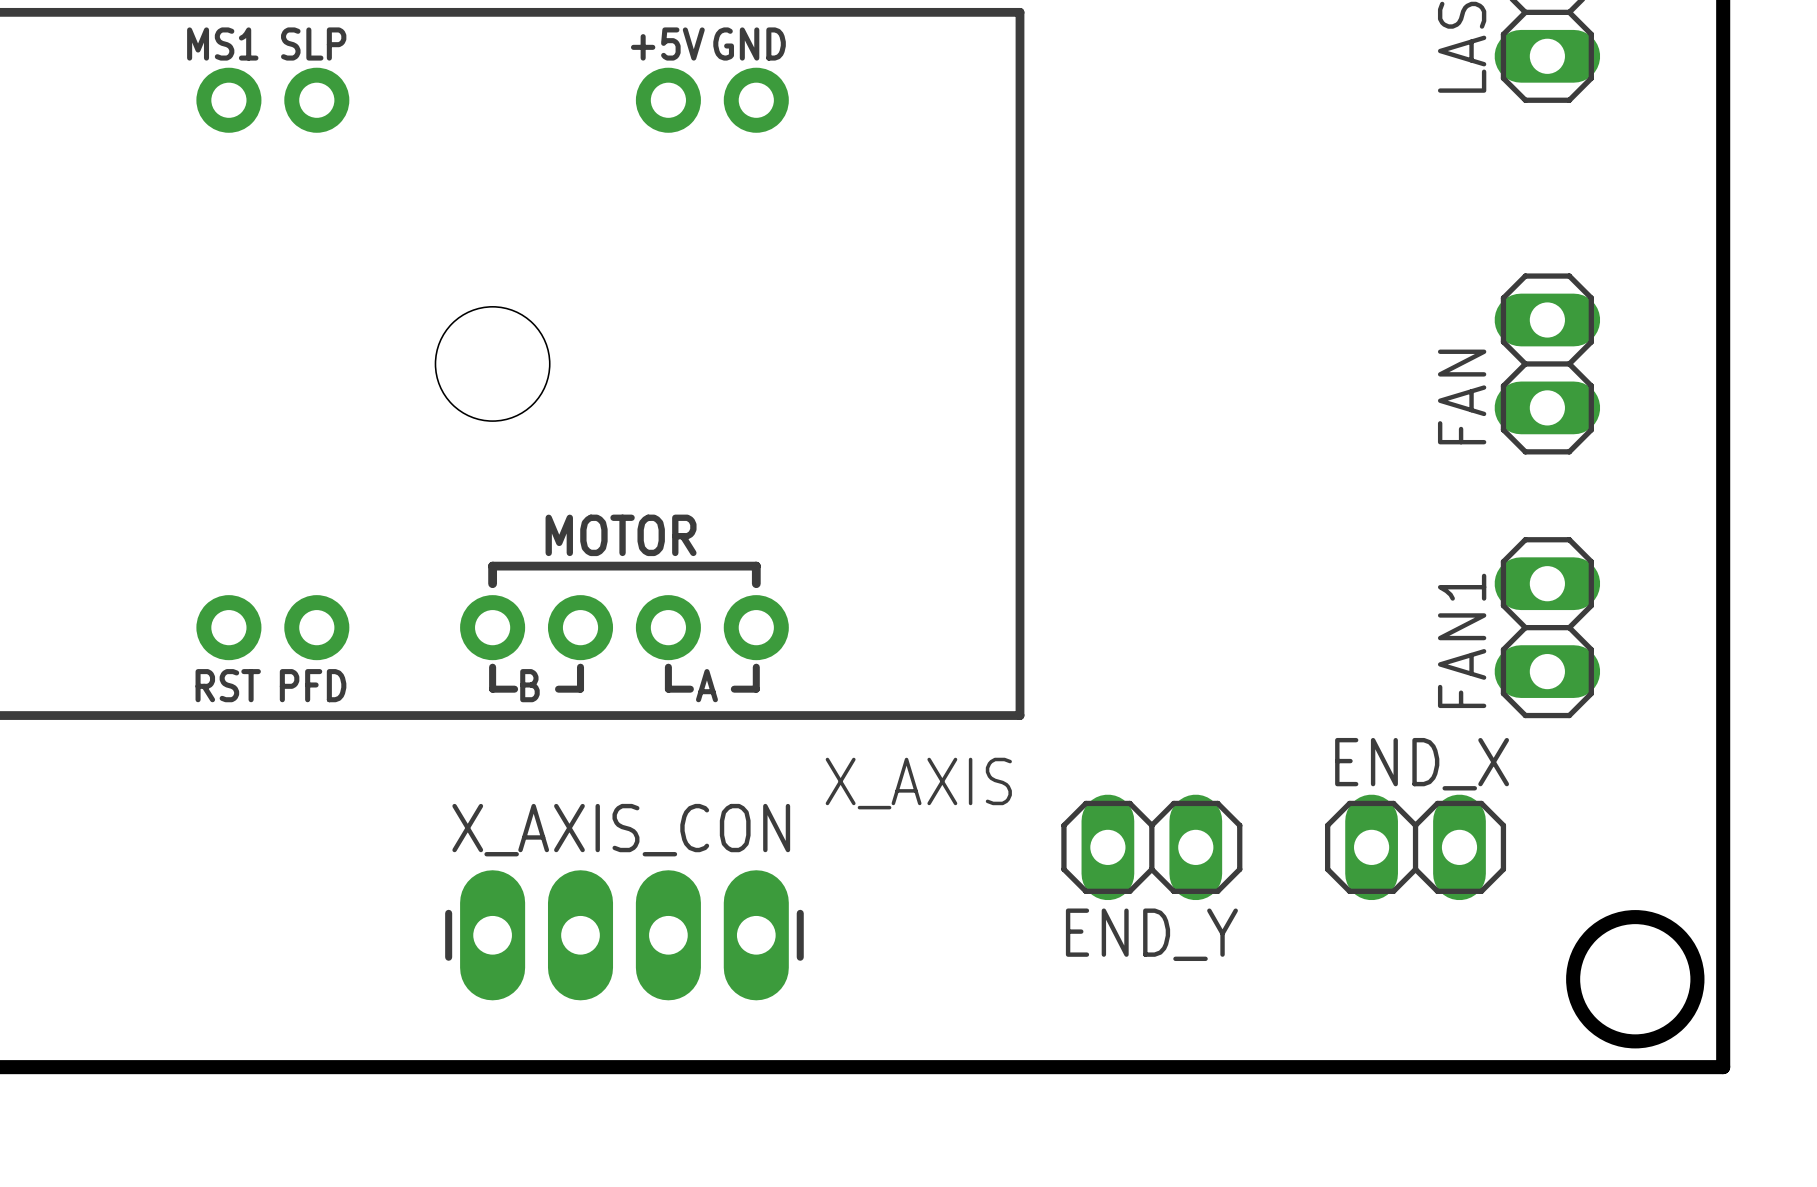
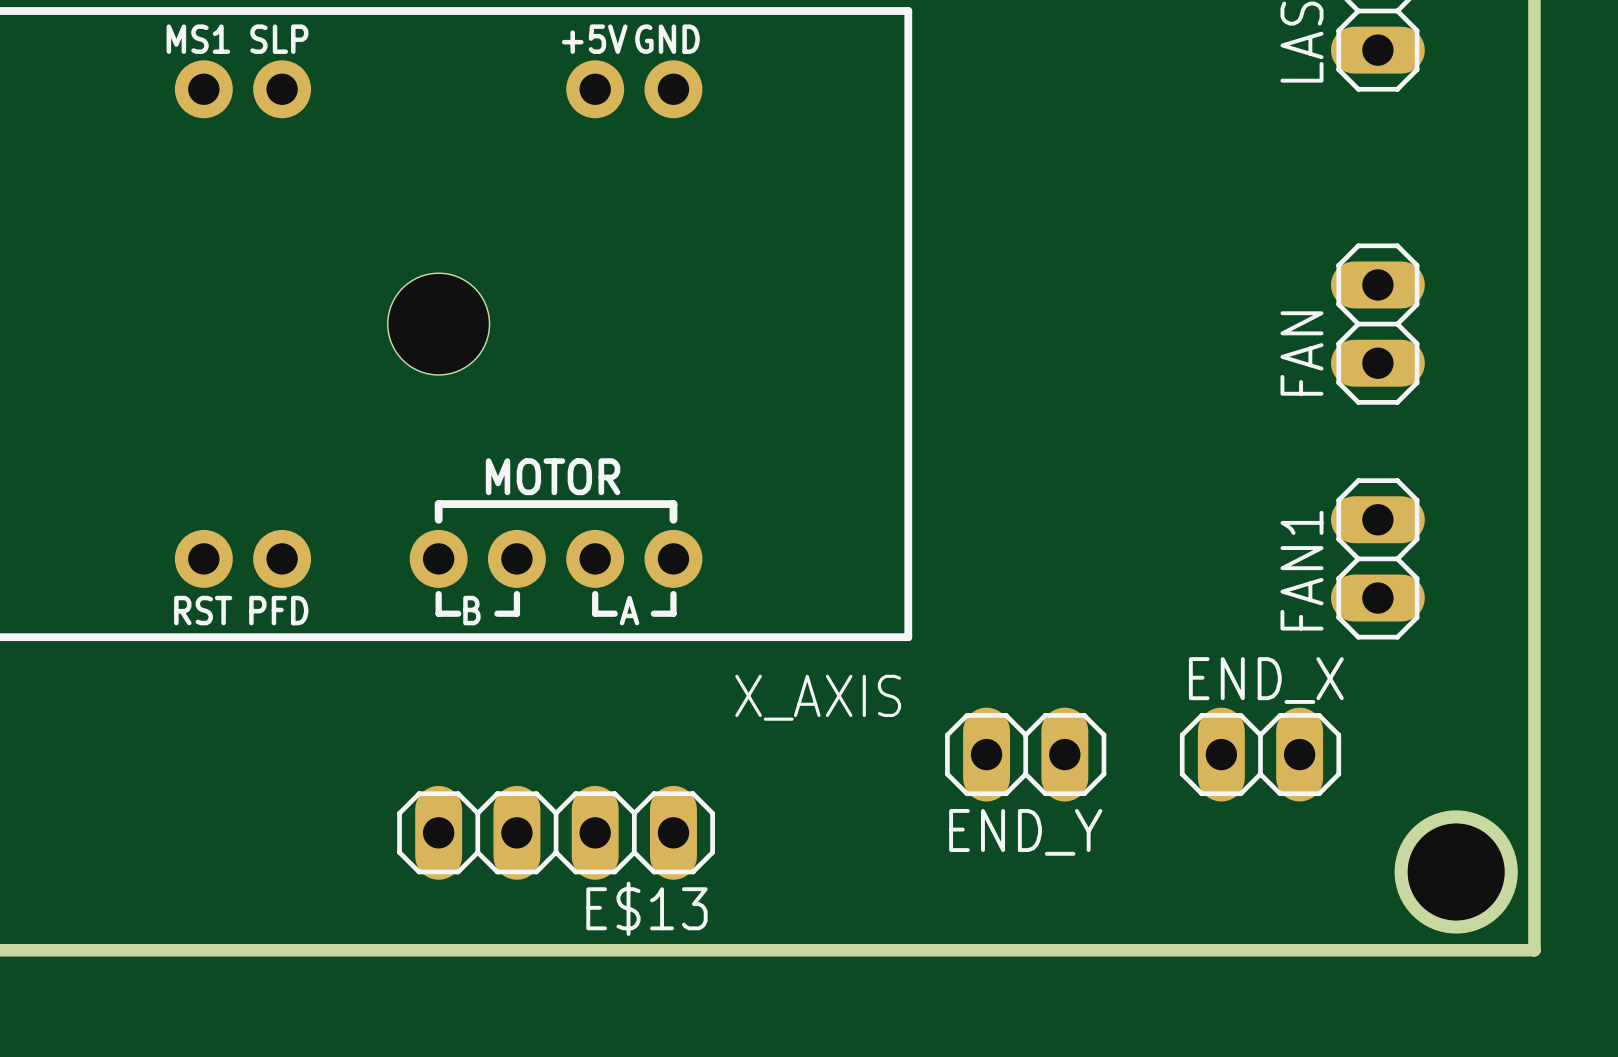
X_AXIS_CON: (624, 935) -> none
E$13: none -> (556, 832)
hole: none -> (1456, 871)

